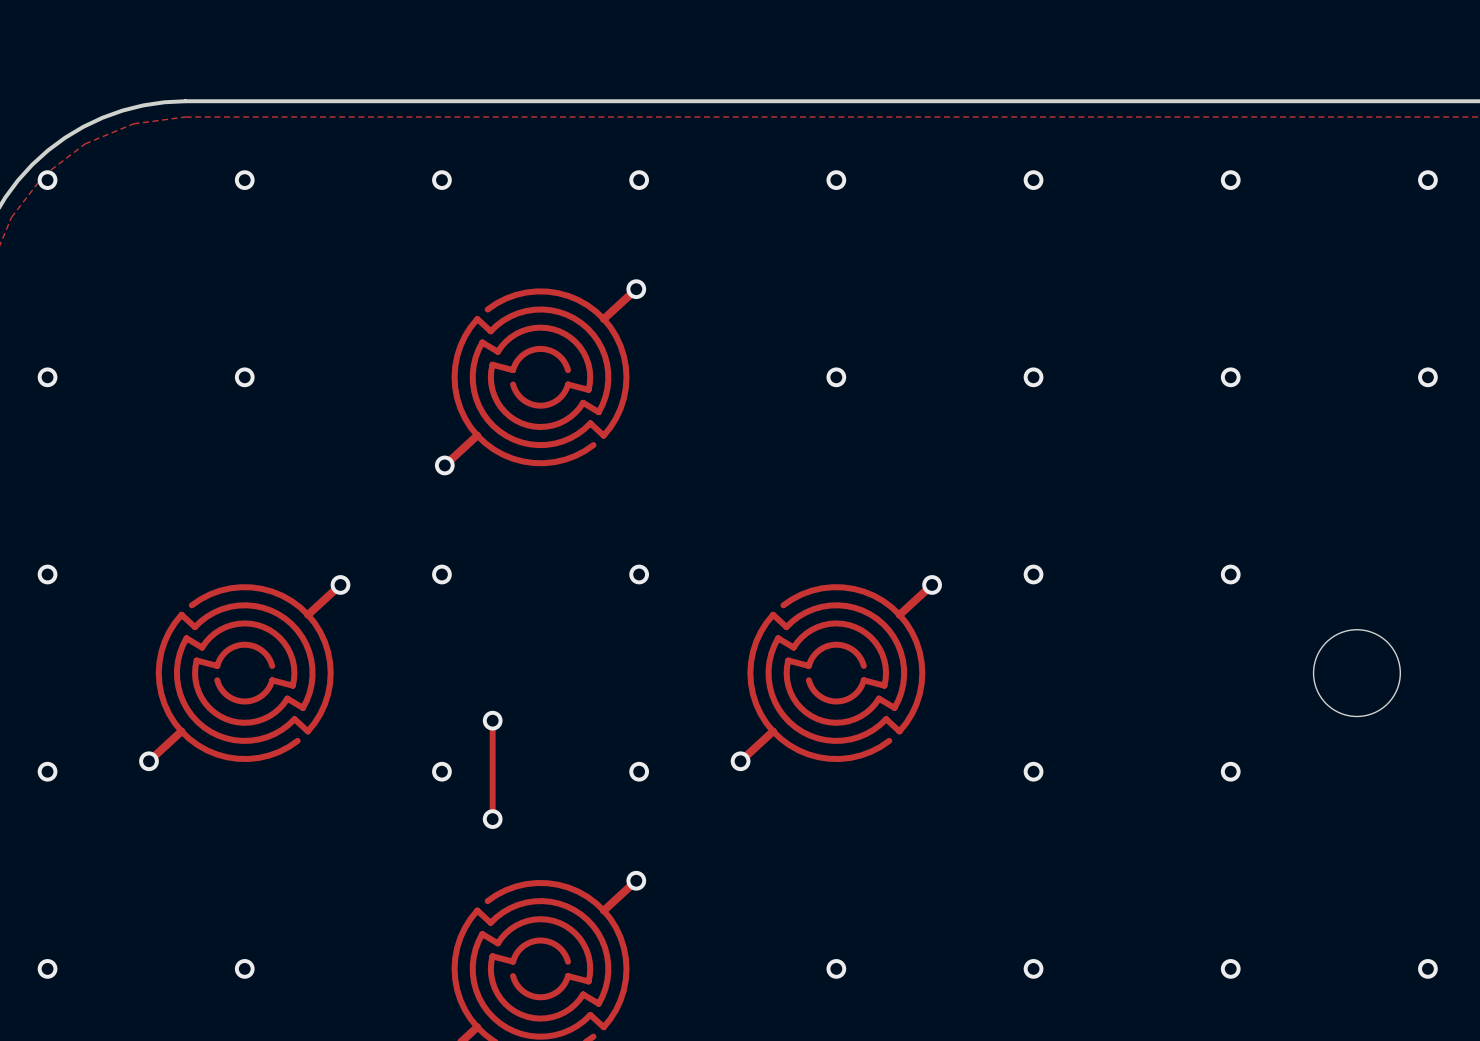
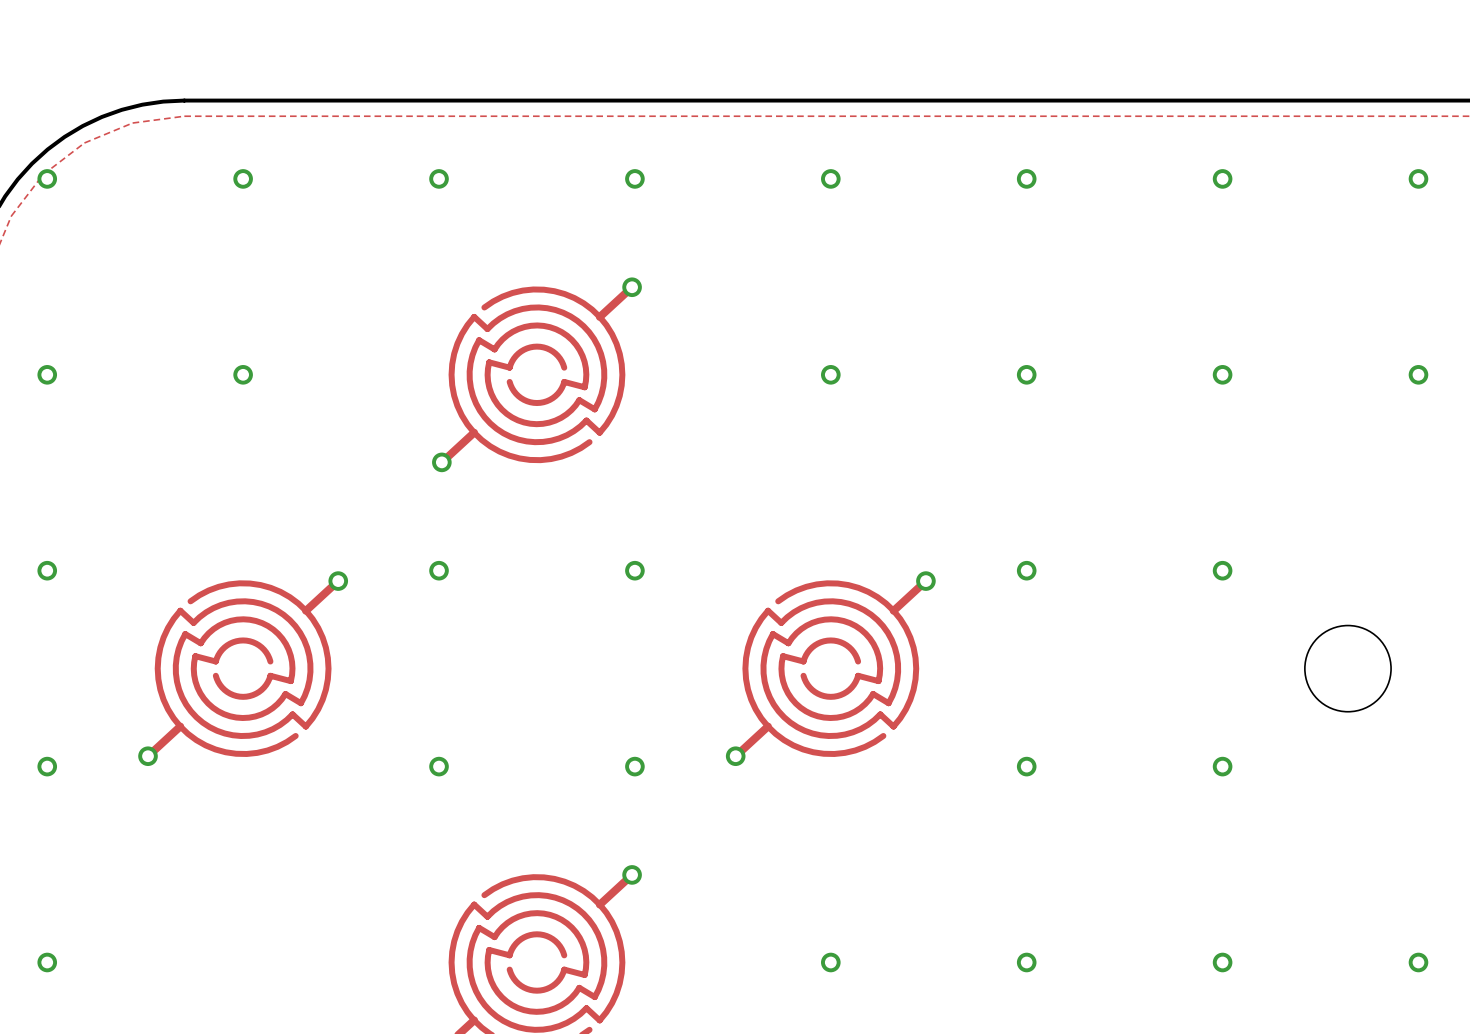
track: (492, 720) (492, 819) -> none
via: (492, 720) -> none
via: (492, 819) -> none
via: (244, 968) -> none

